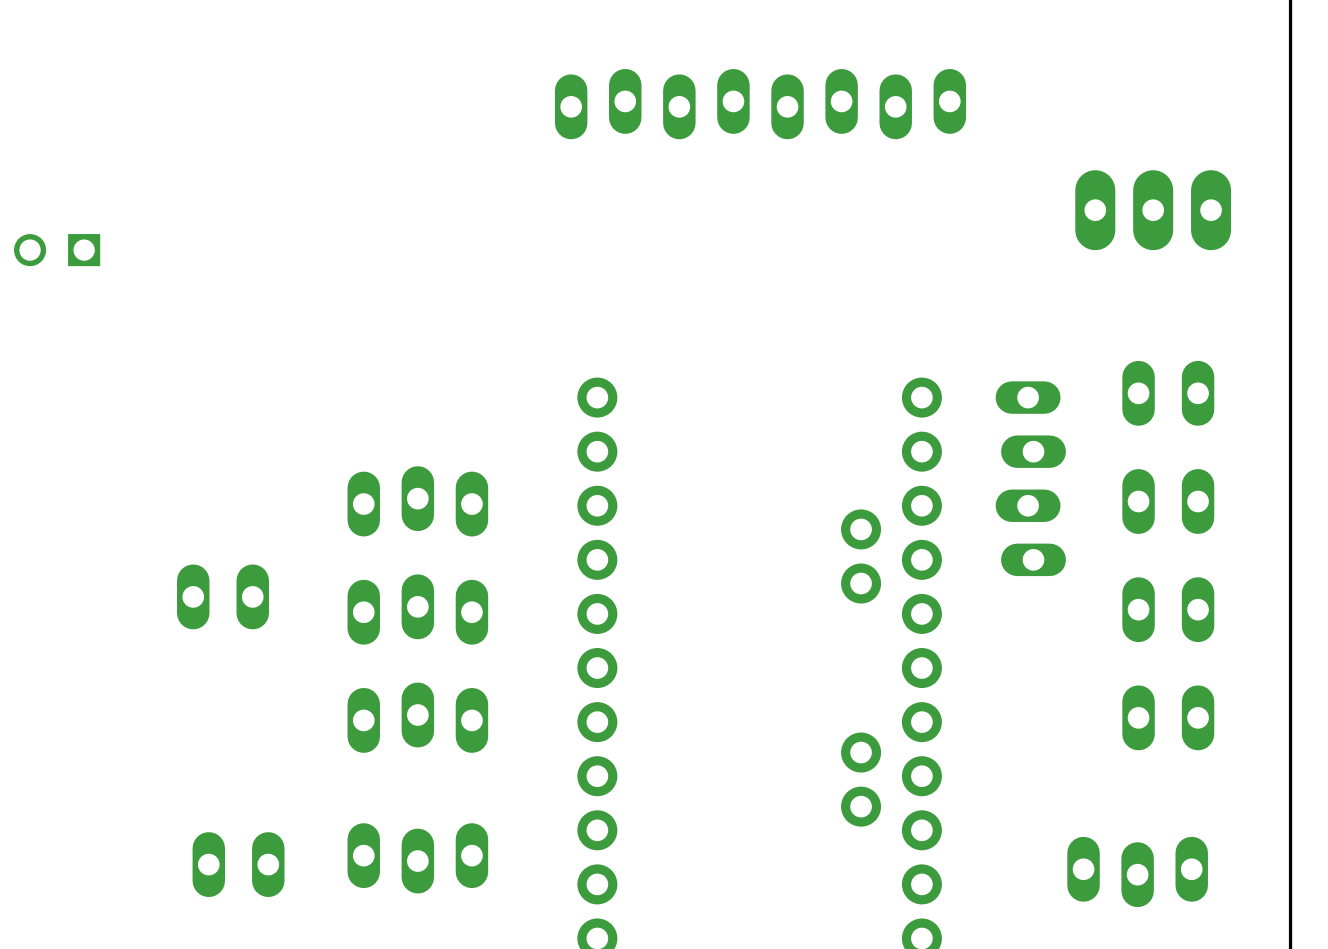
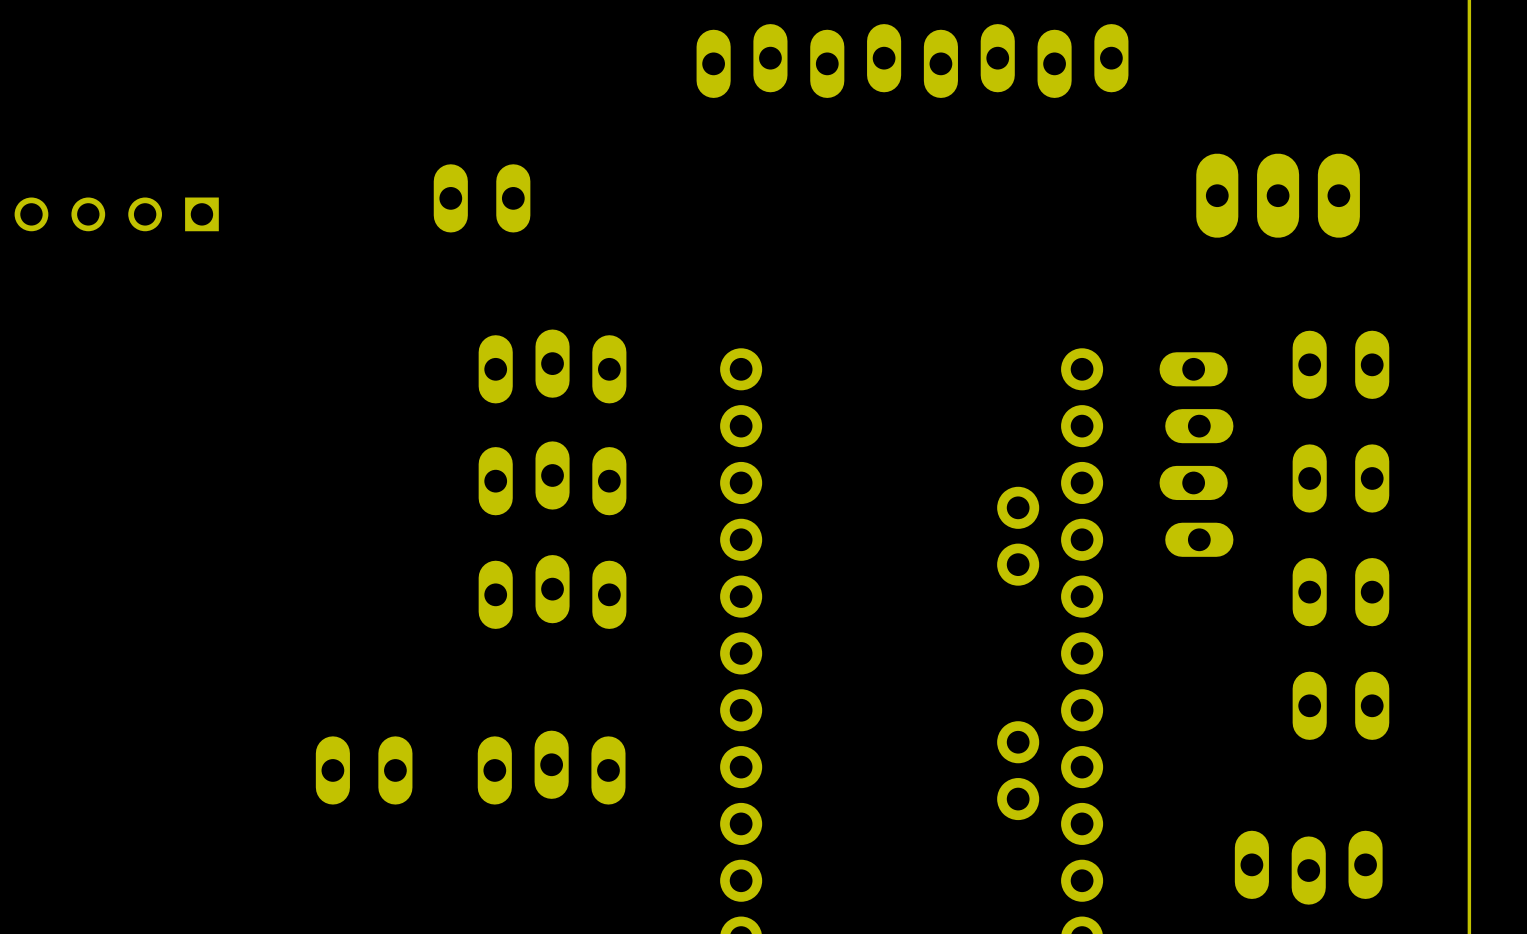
part position: (1153, 210) -> (1278, 195)
part: none -> (482, 198)
part: none -> (552, 366)
part: (222, 596) -> none
part: (417, 717) -> none
part: none -> (551, 767)
part: (417, 858) -> none
part position: (238, 864) -> (364, 770)

